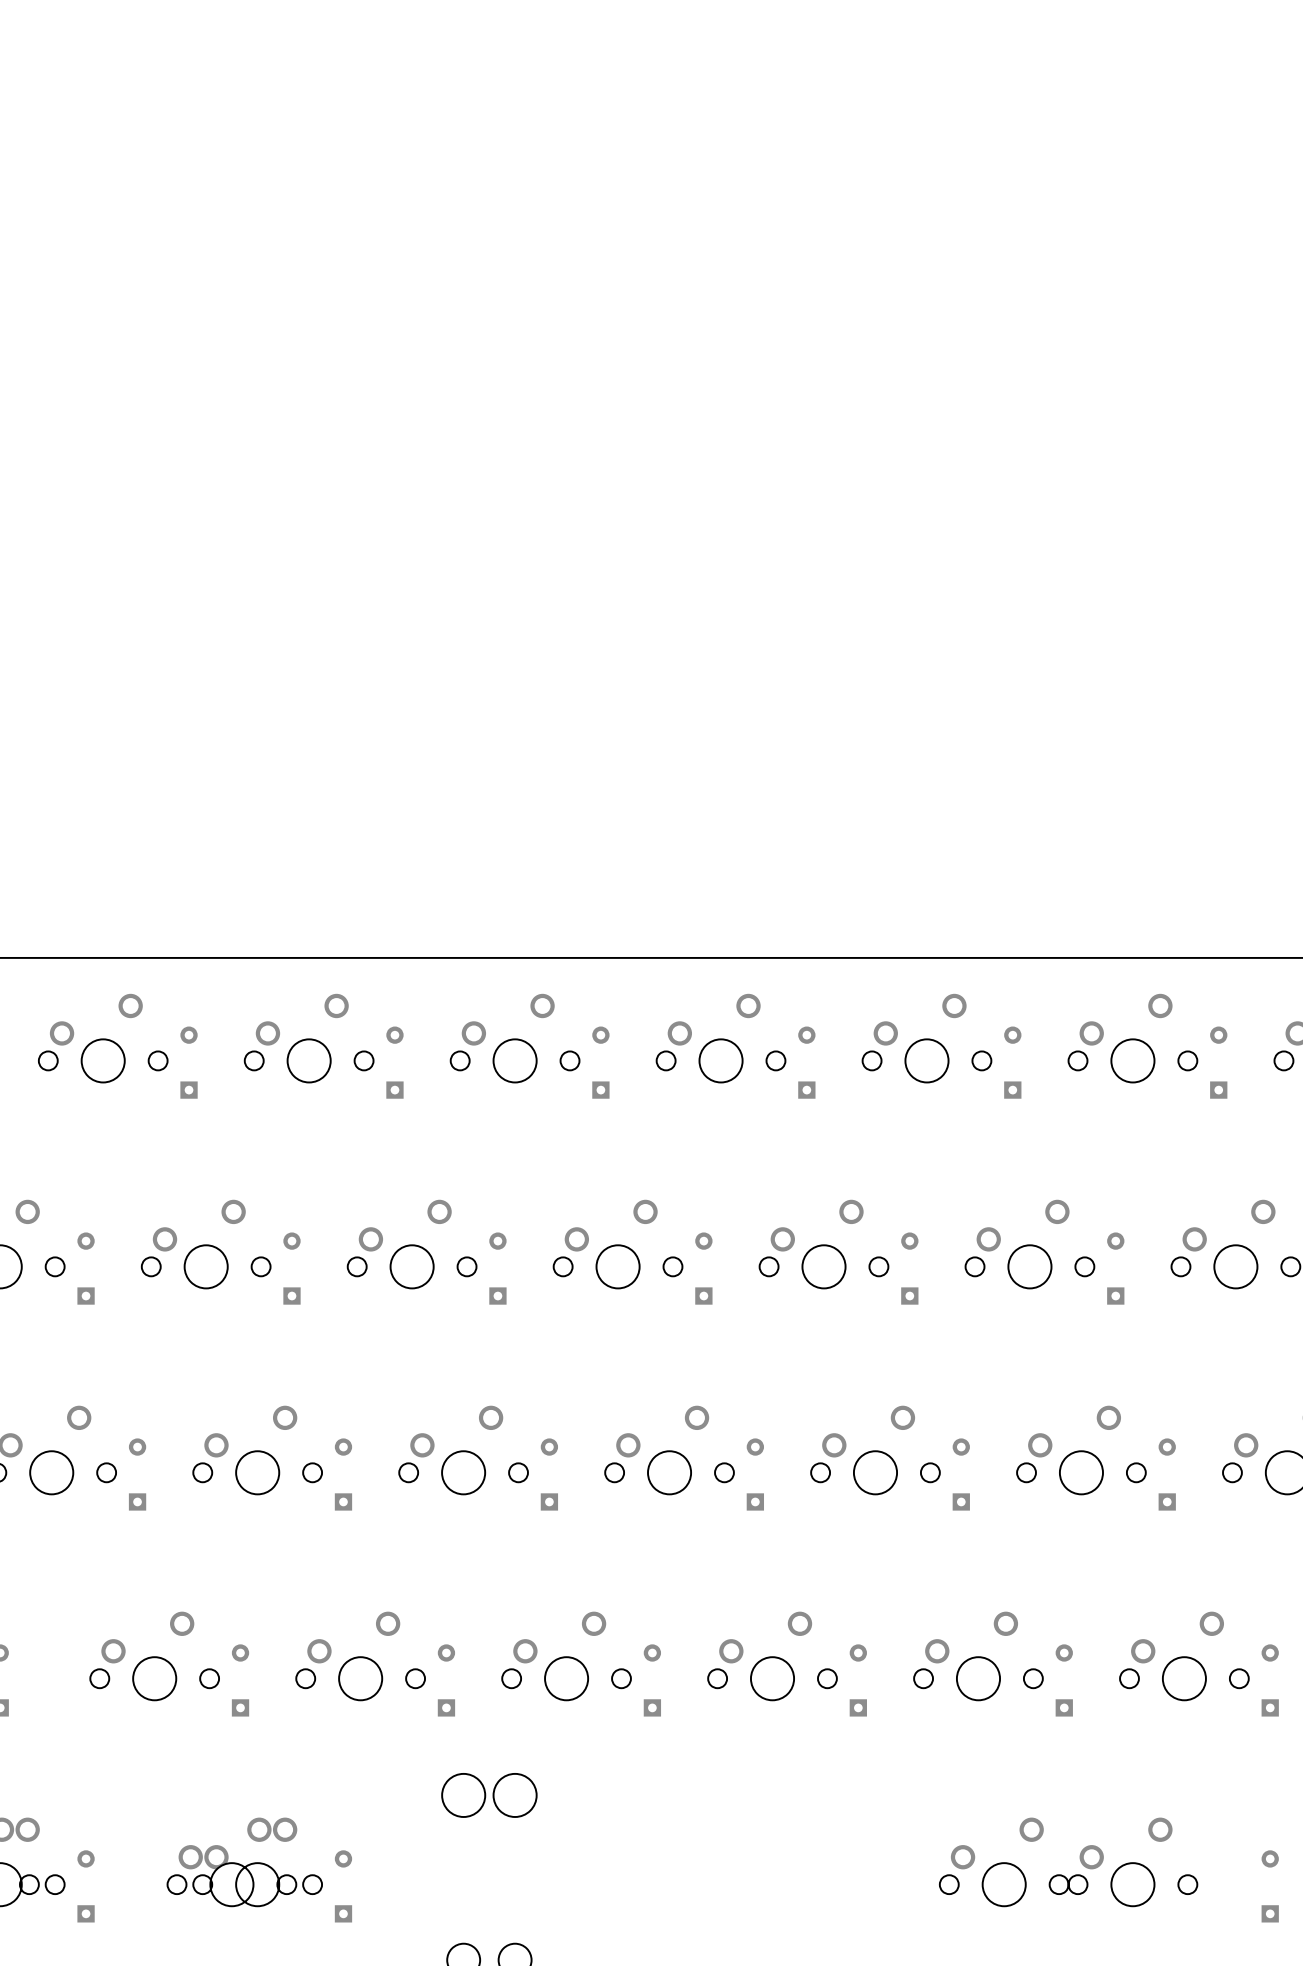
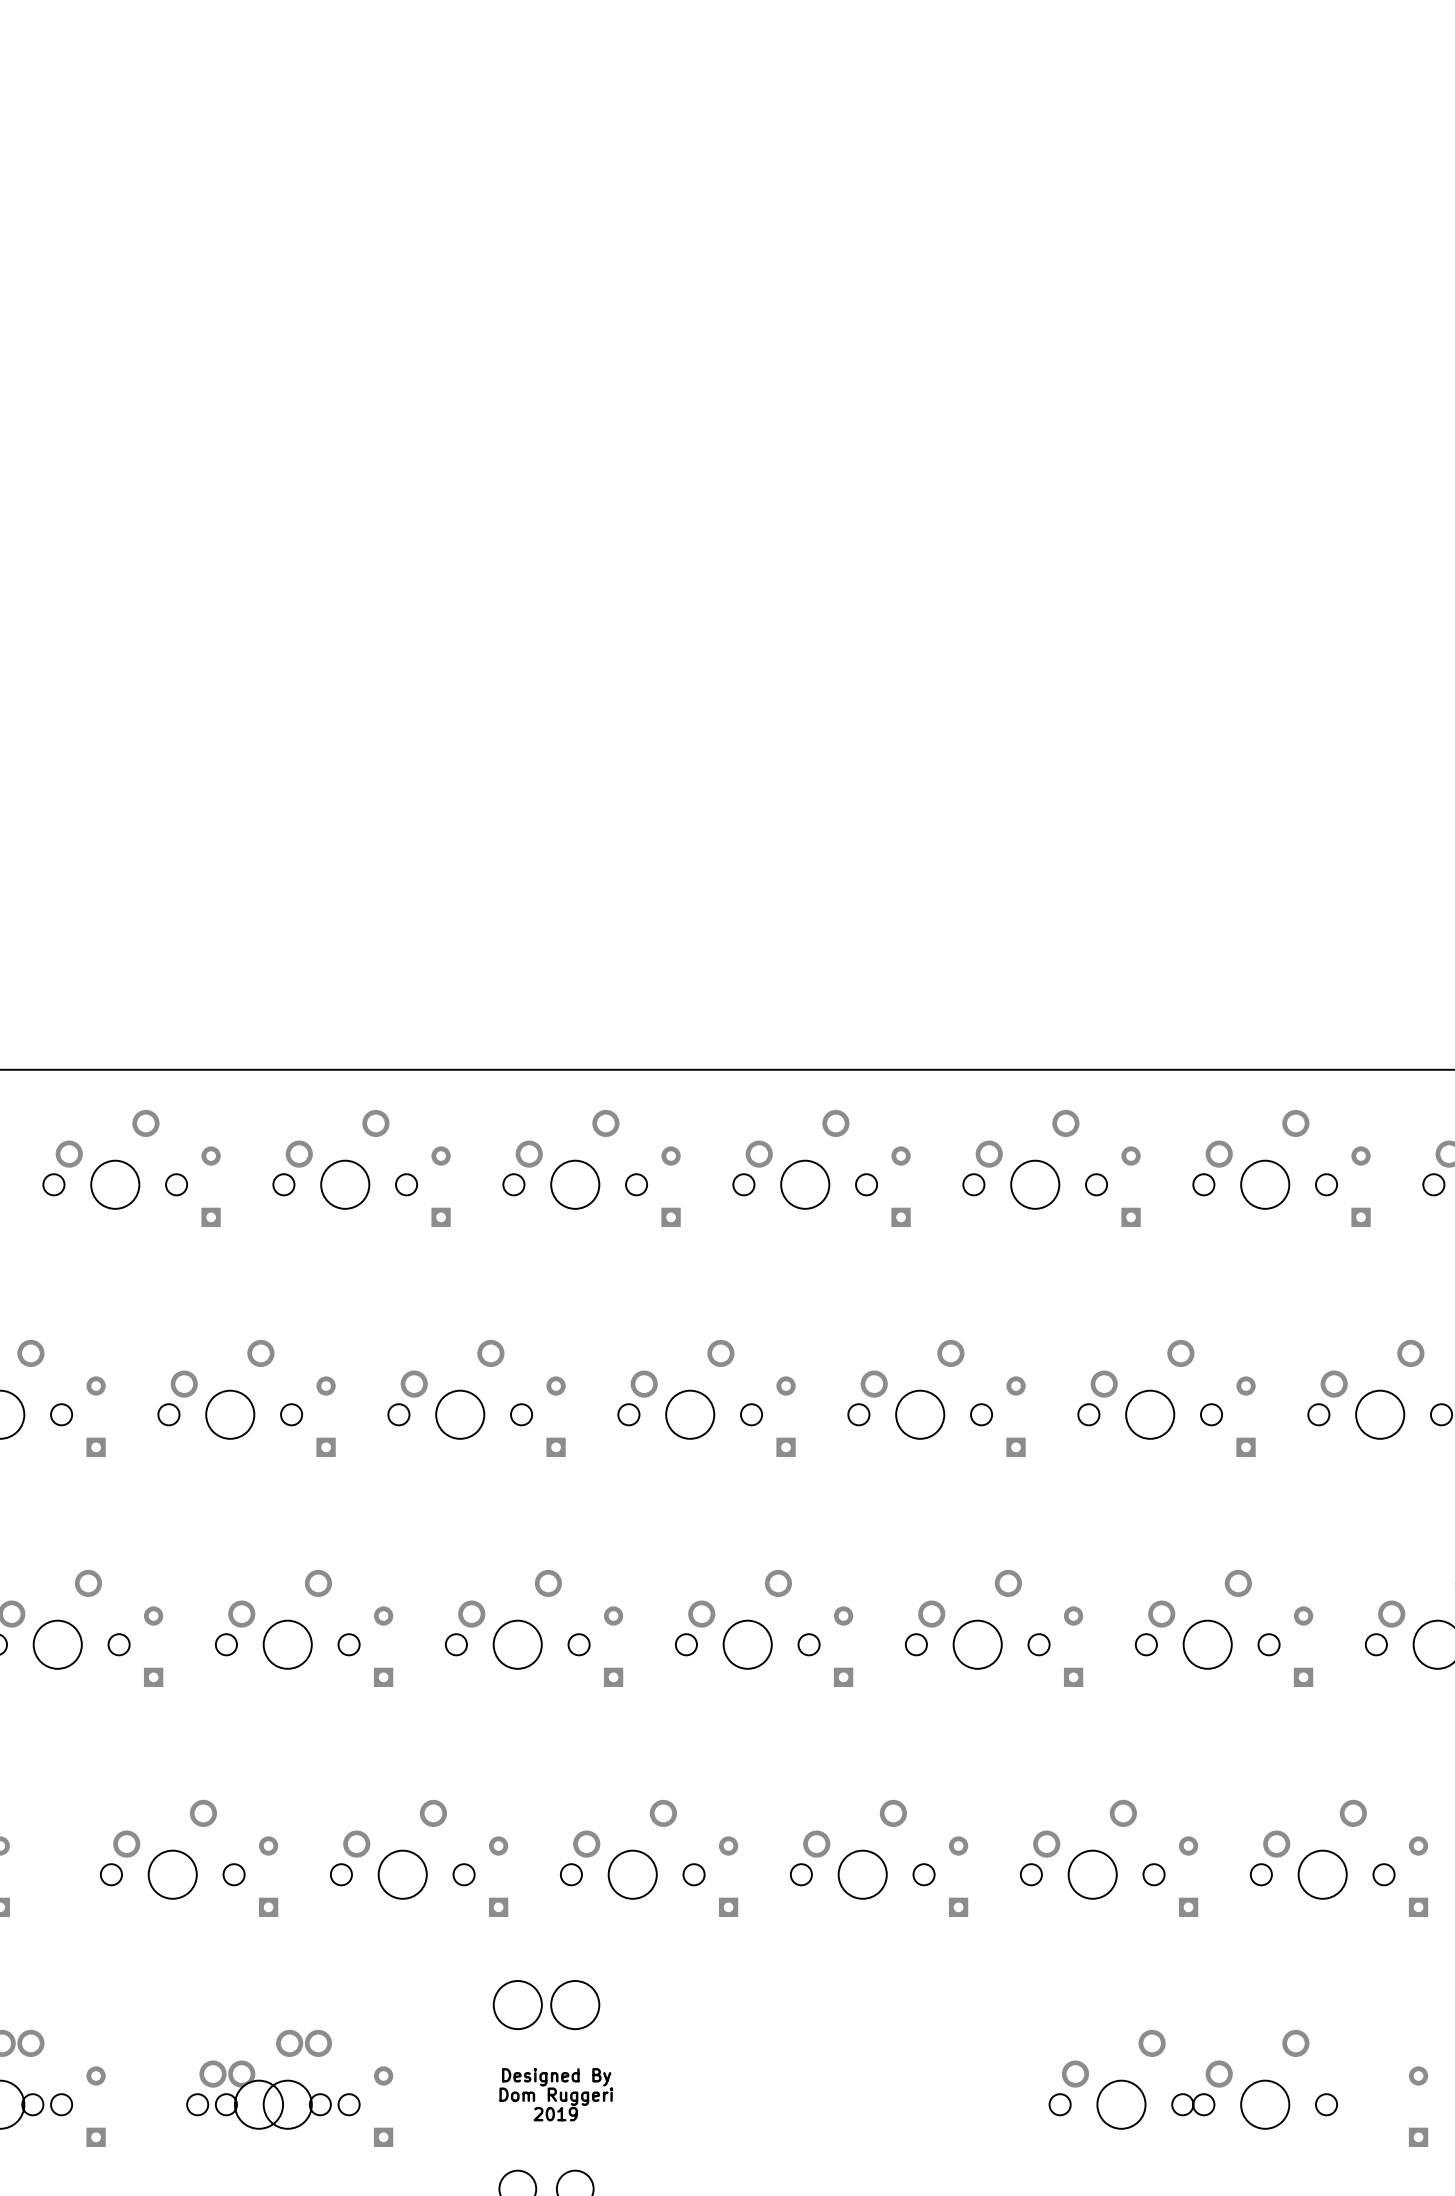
text: none -> Designed By (556, 2077)
text: none -> Dom Ruggeri (556, 2096)
text: none -> 2019 (555, 2114)

